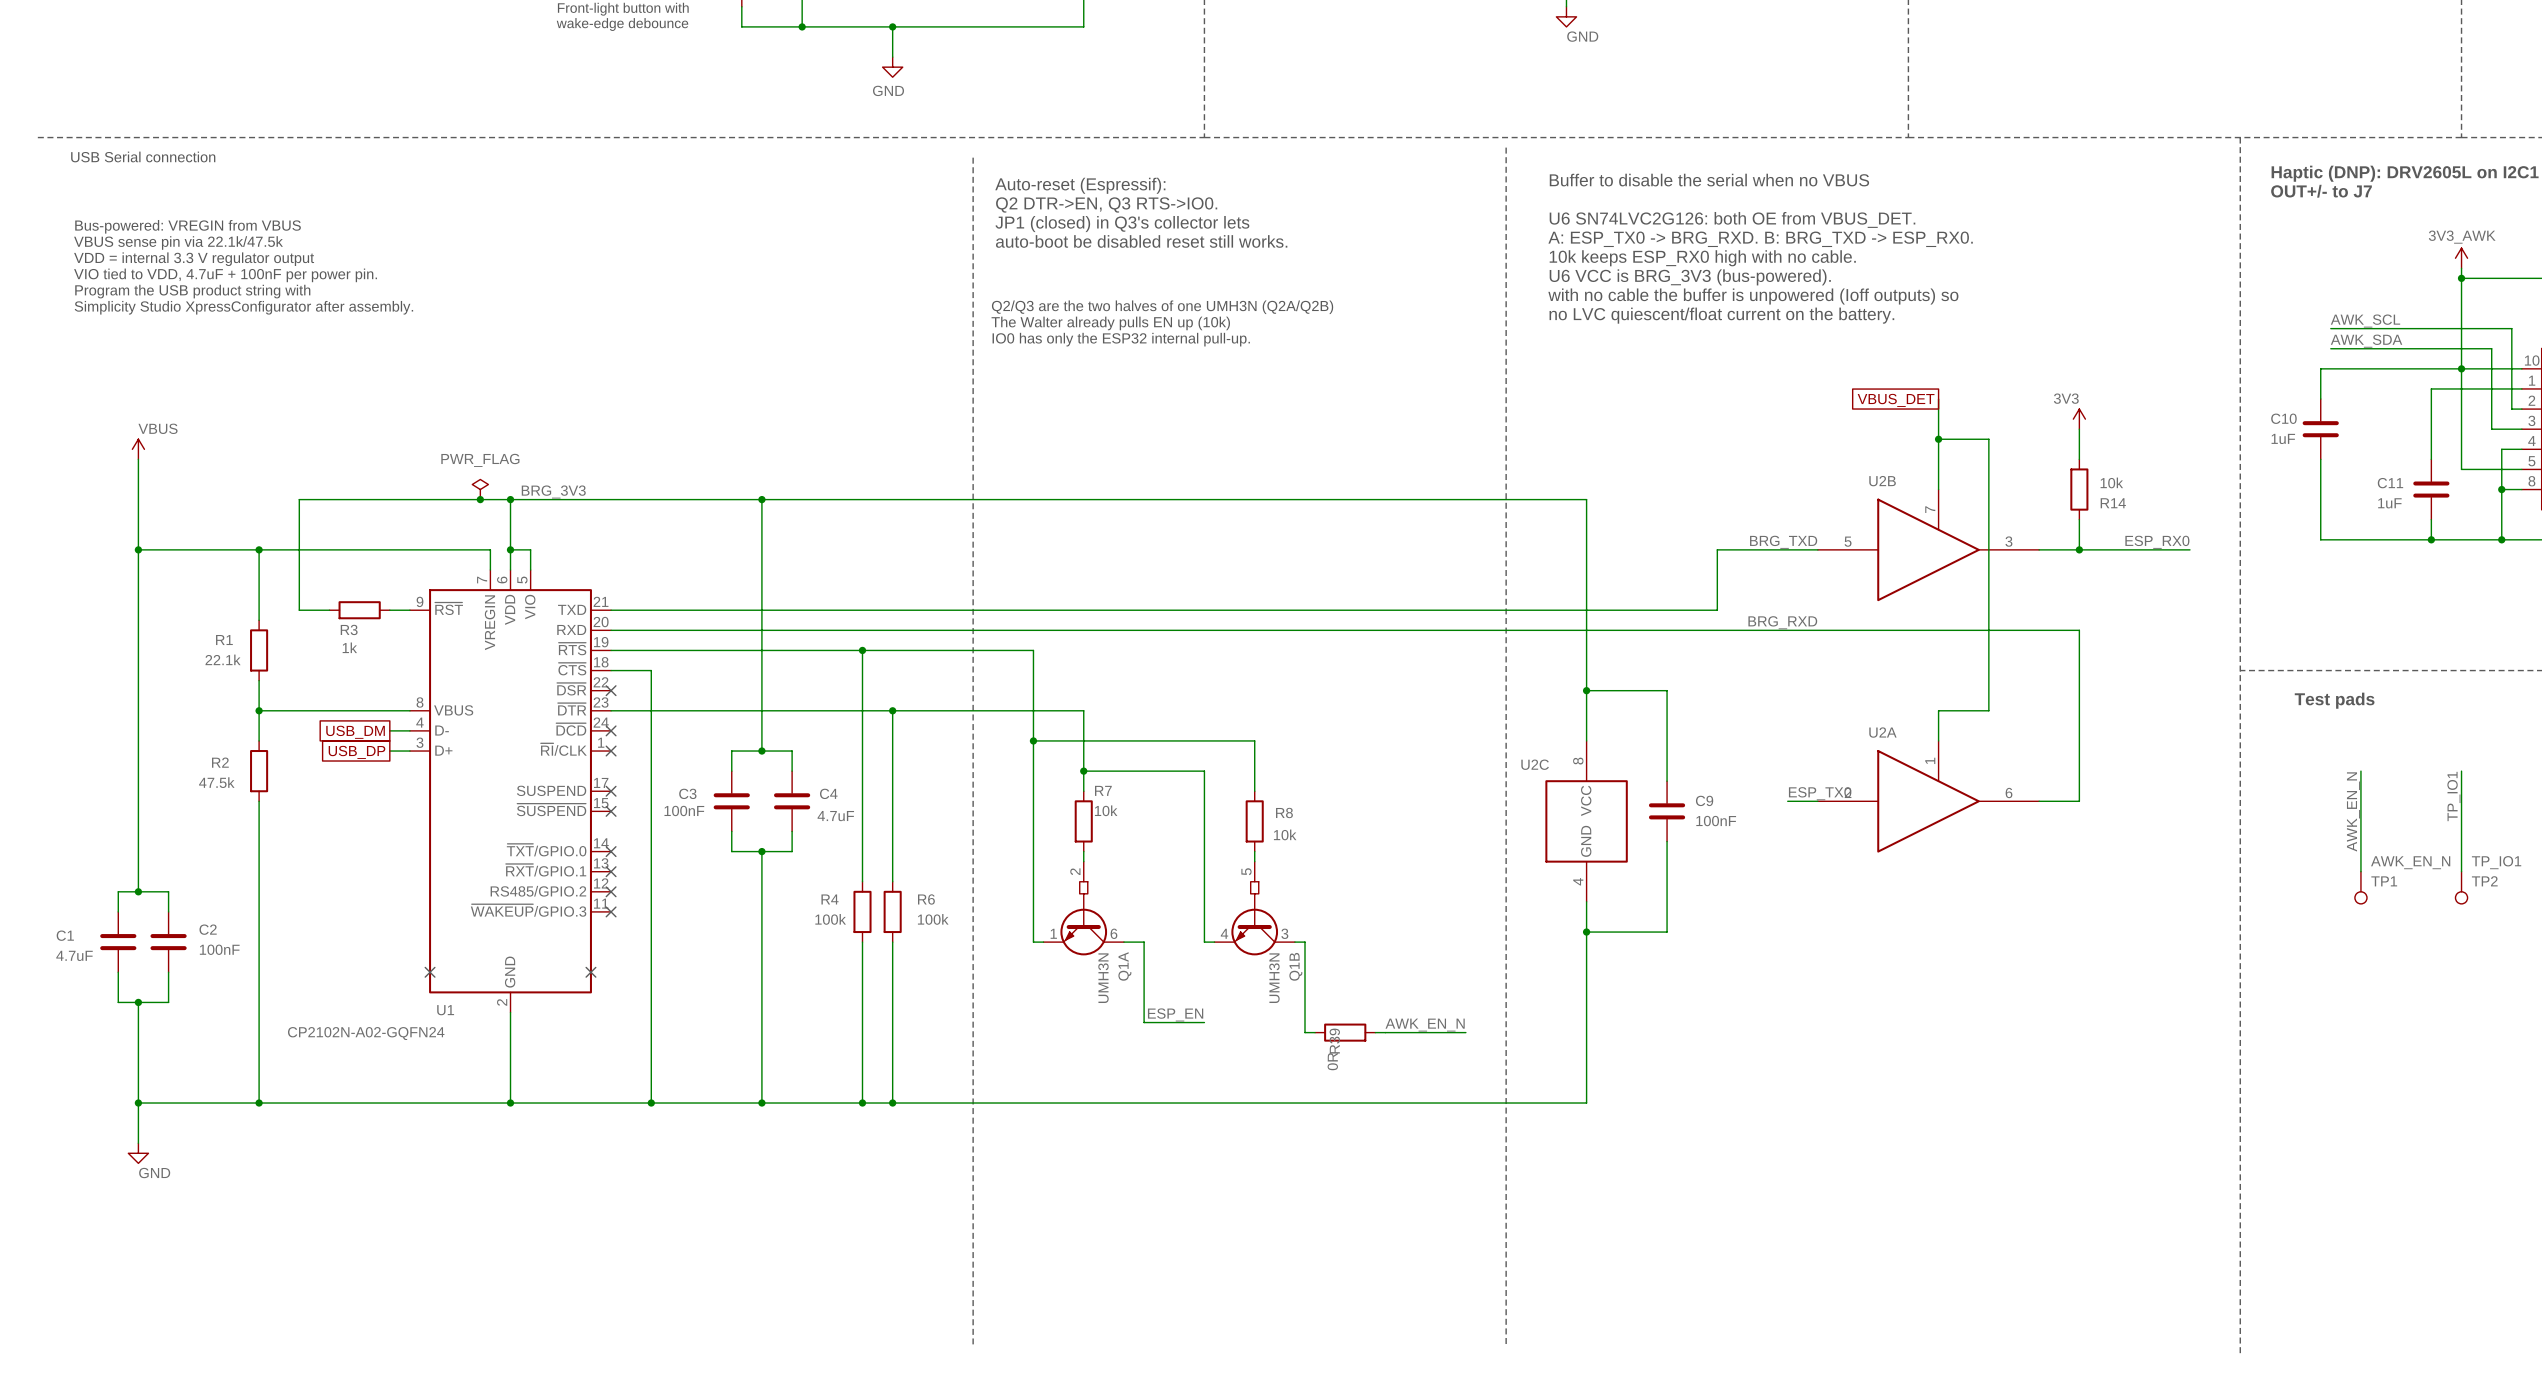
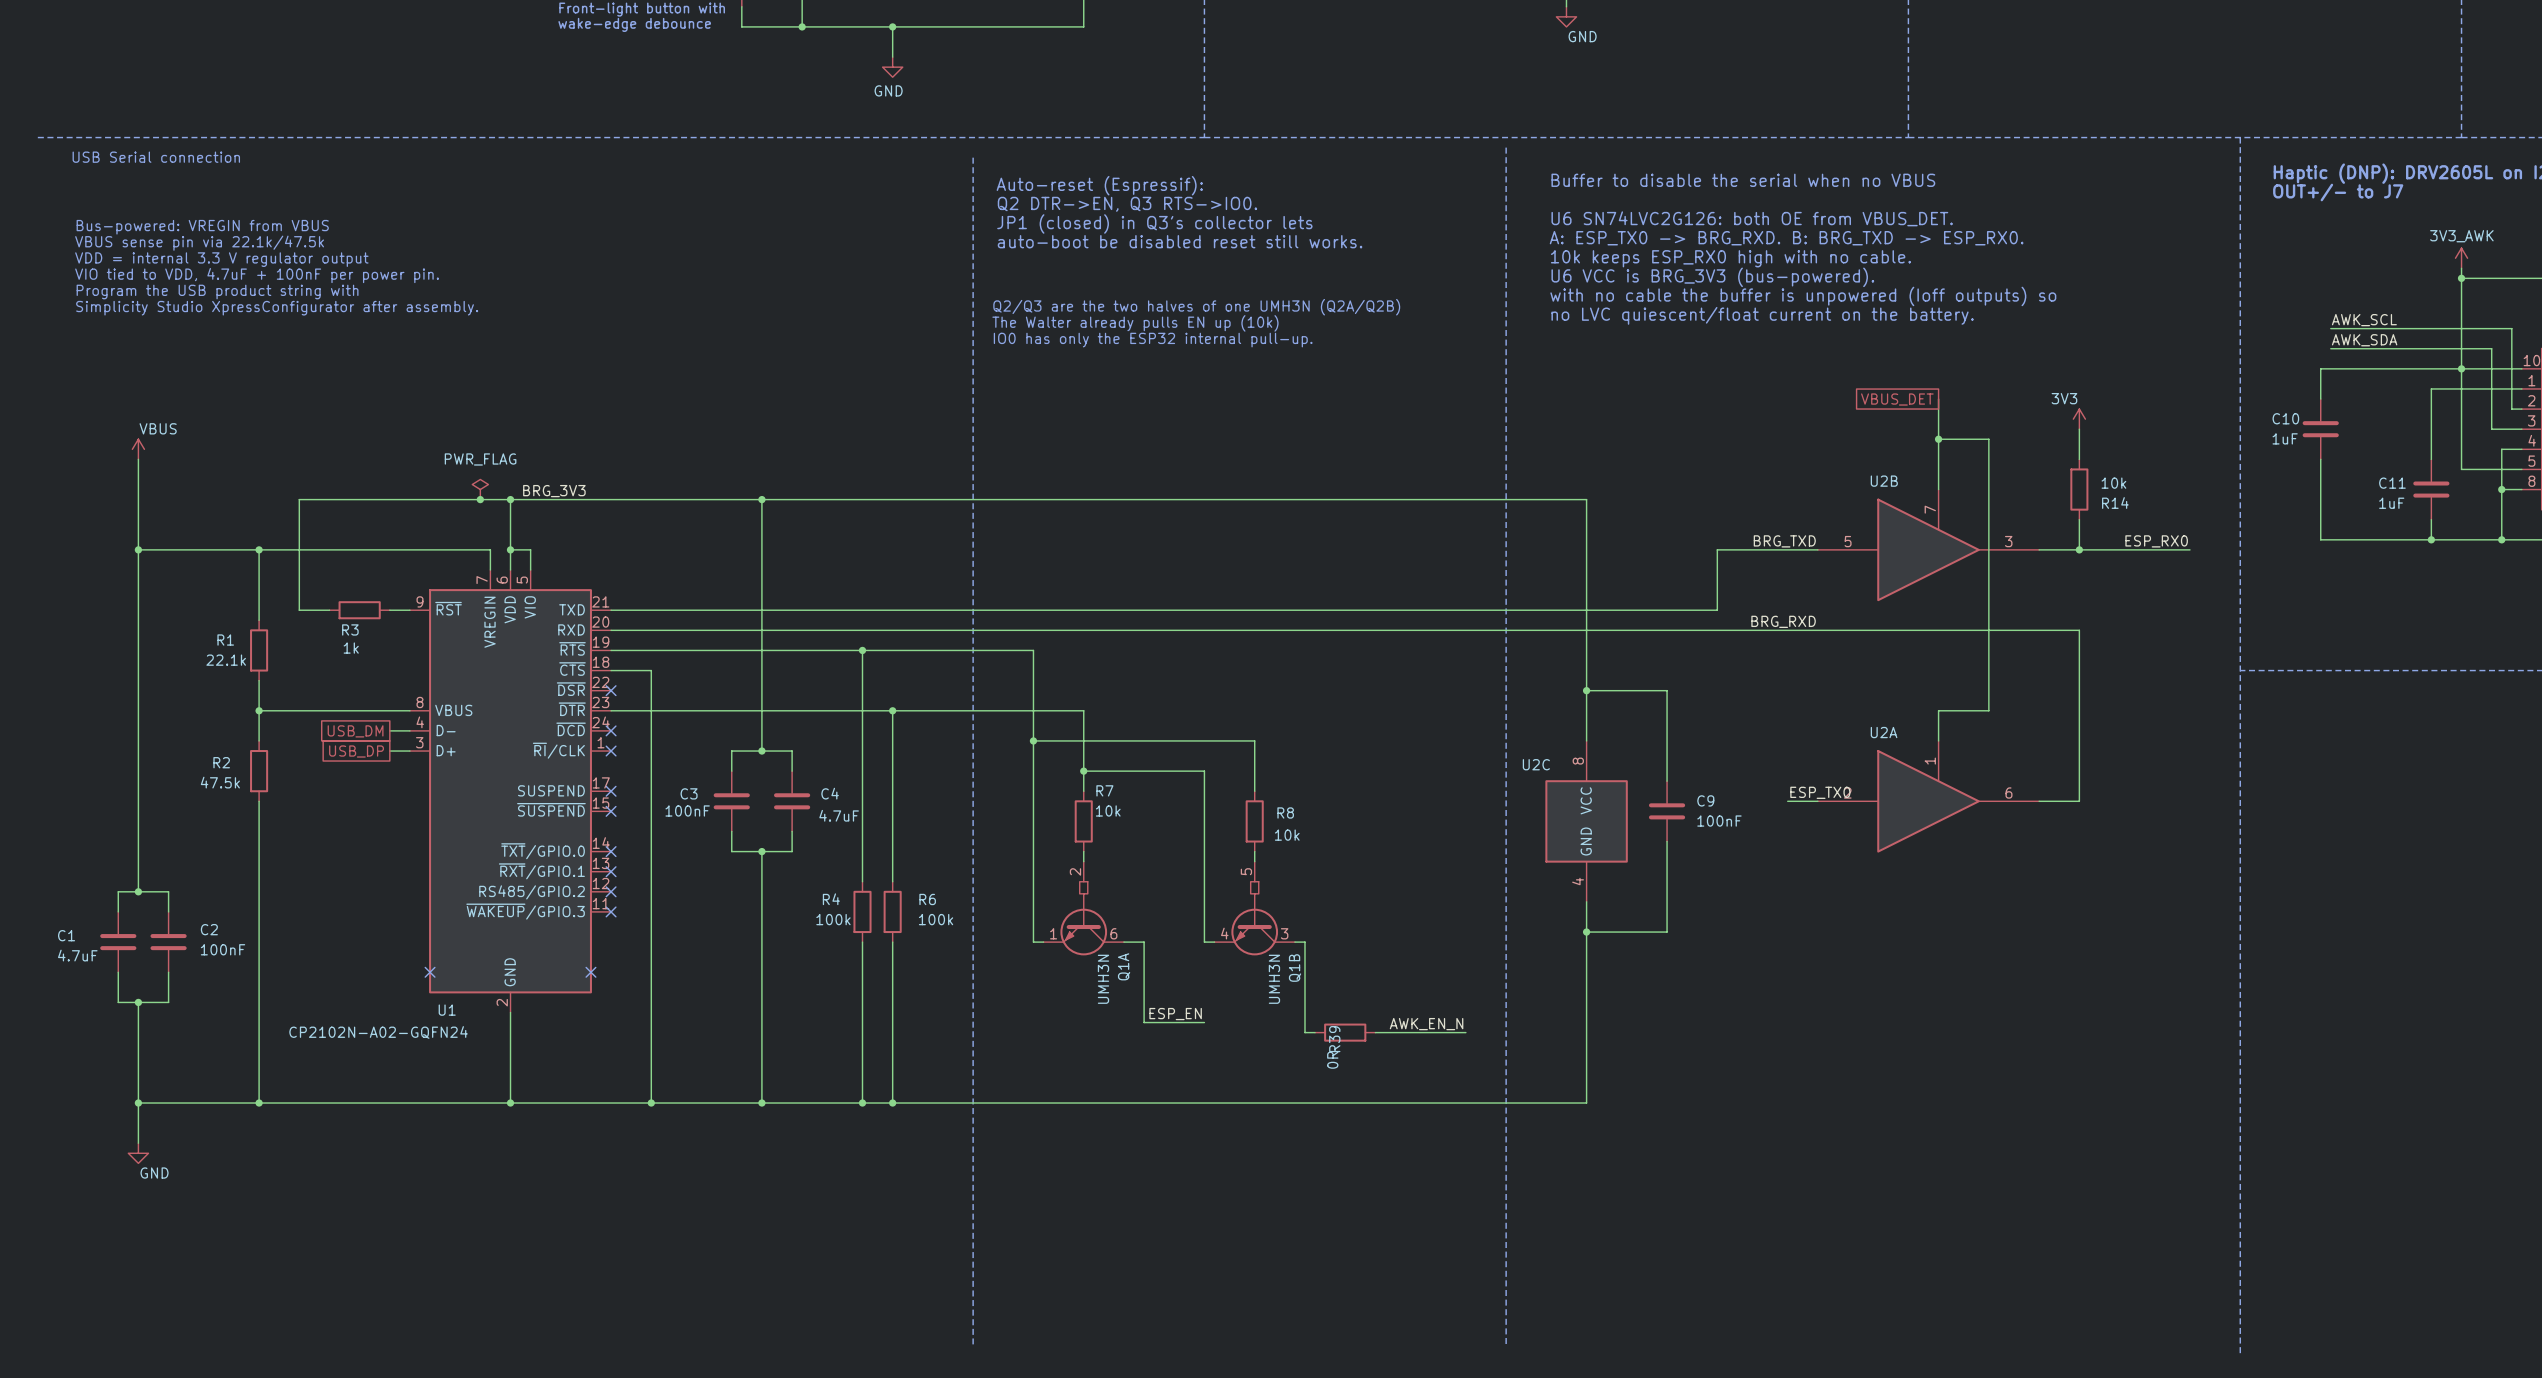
text: Test pads (2334, 700) -> none
wire: (2360, 771) (2360, 871) -> none
wire: (2461, 771) (2461, 871) -> none
label: TP_IO1 (2453, 796) -> none
label: AWK_EN_N (2353, 811) -> none
TP1: AWK_EN_N (2360, 887) -> none
TP2: TP_IO1 (2461, 887) -> none

